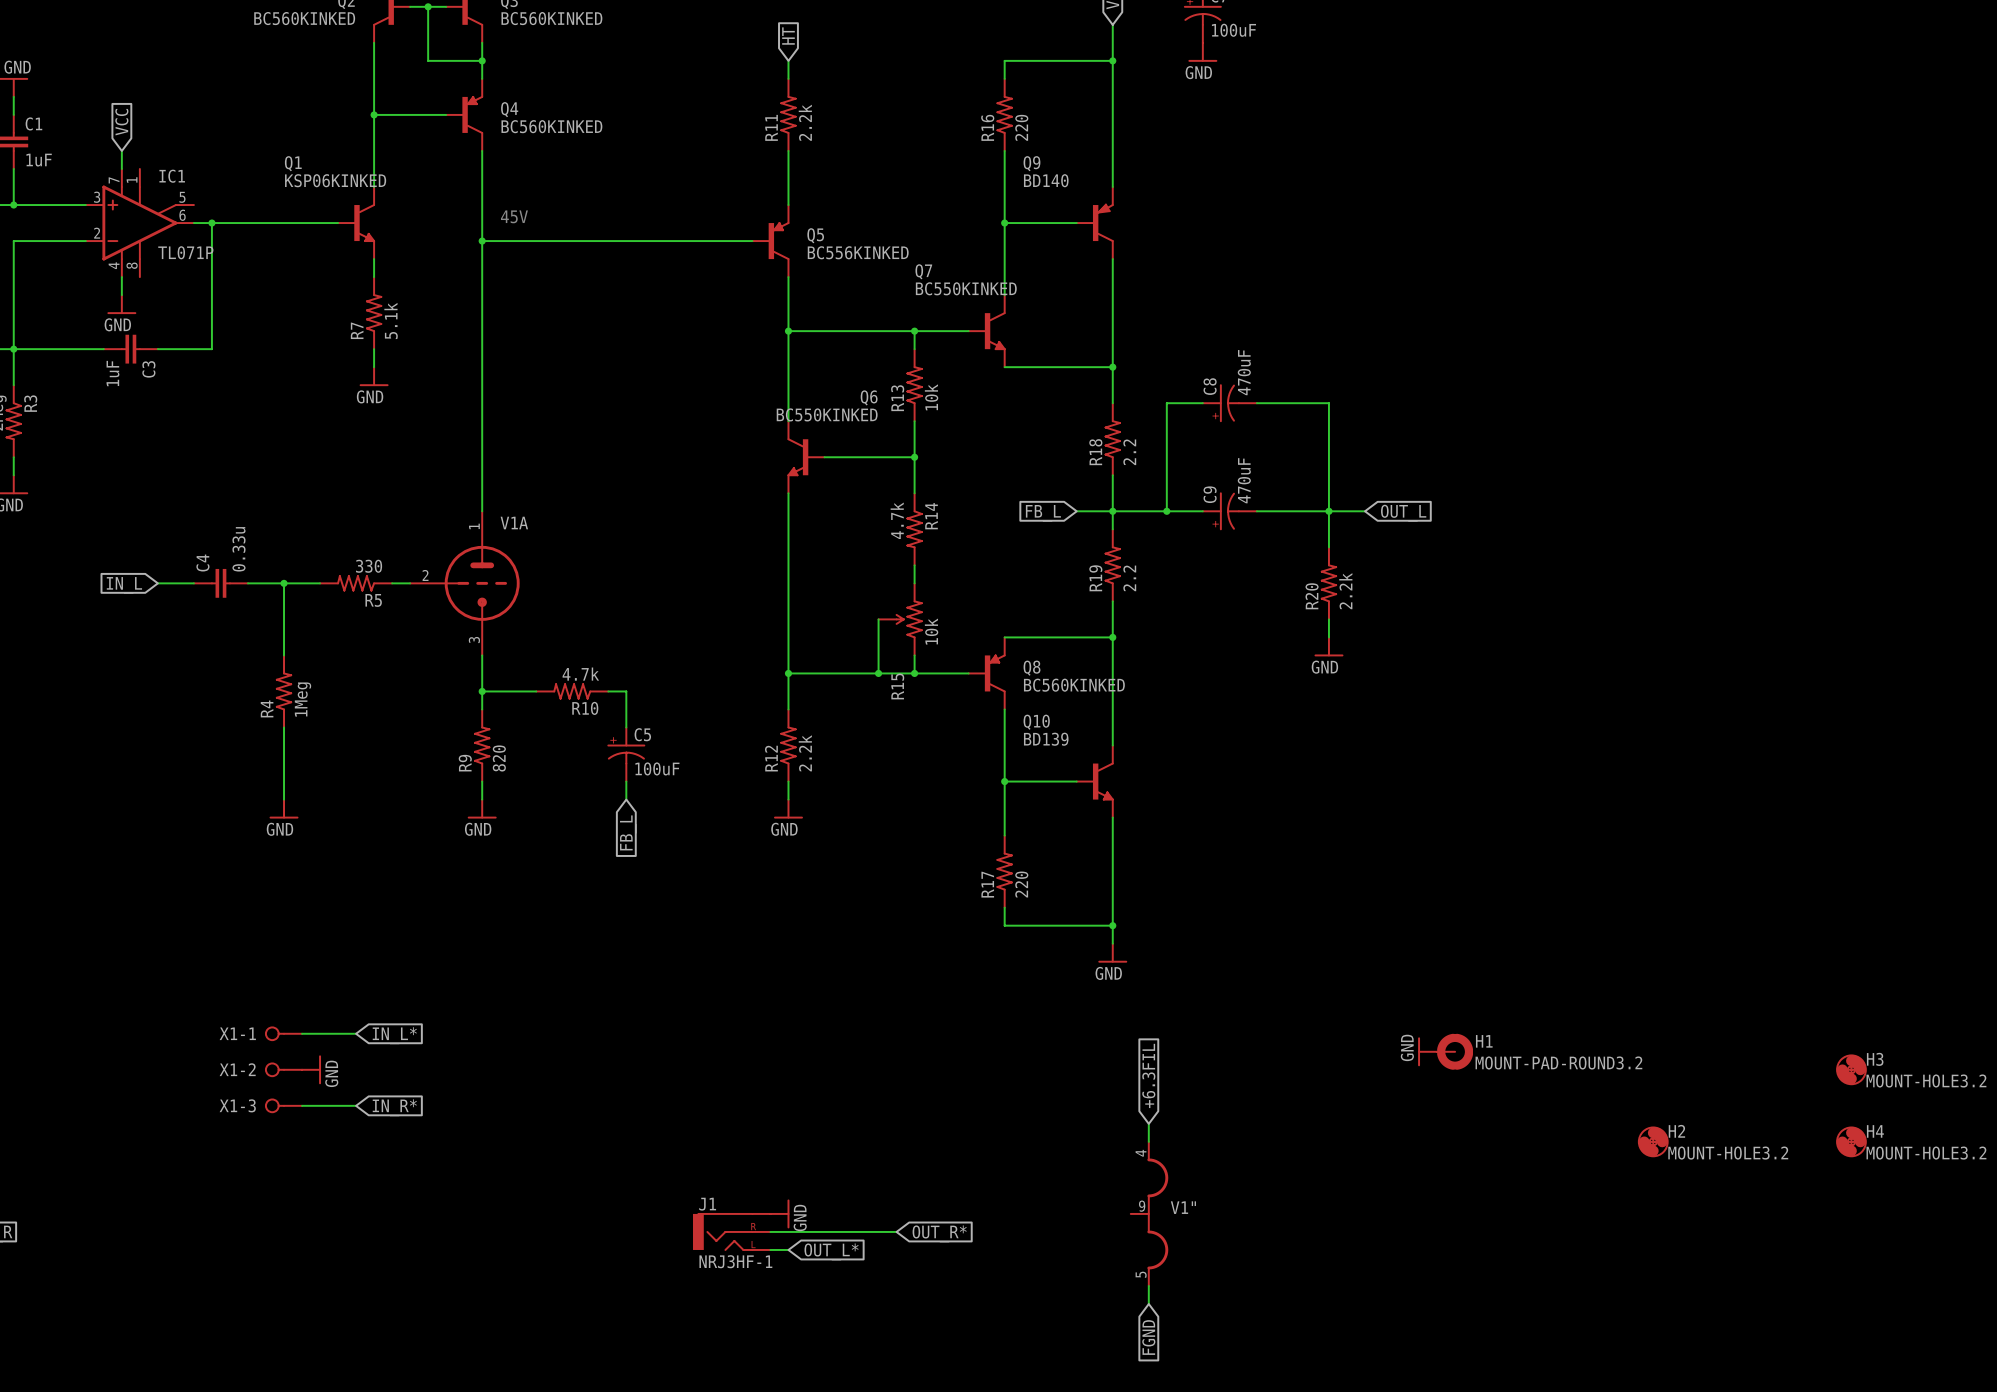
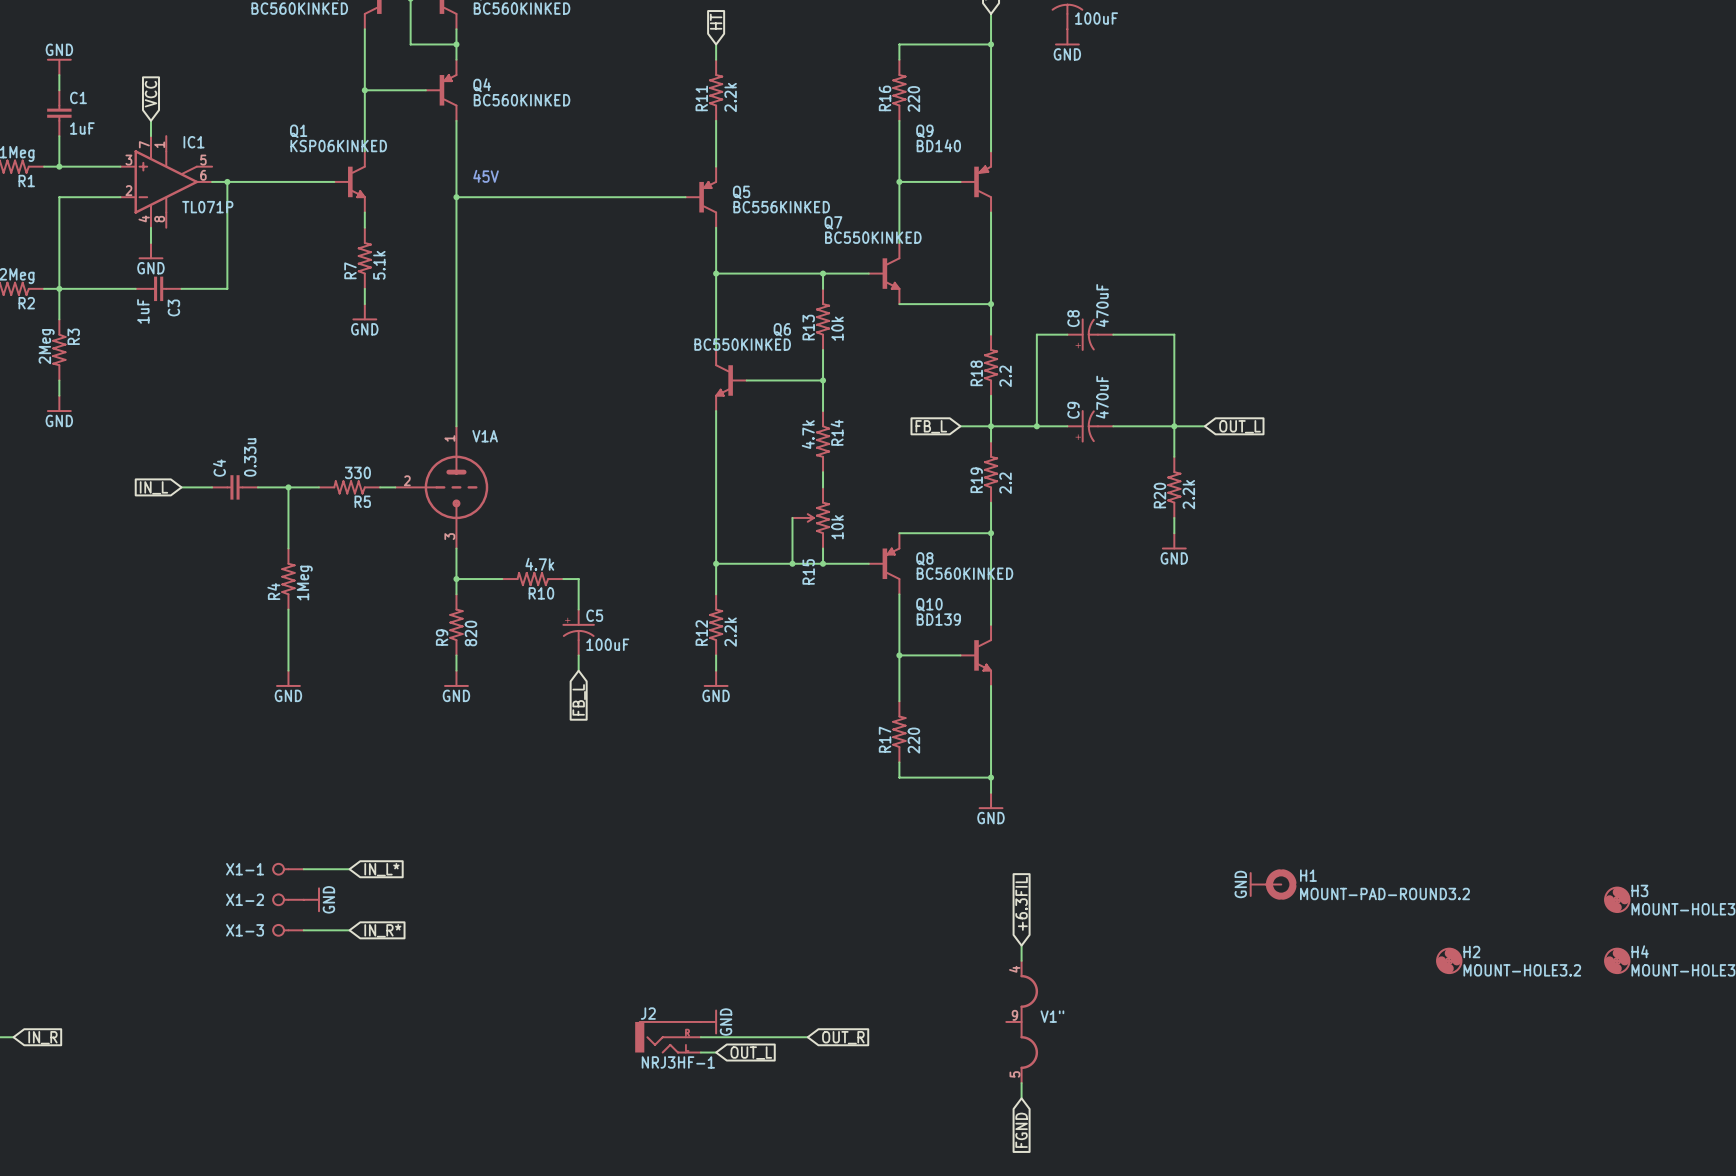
J1 name: J1 (707, 1204) -> J2 (648, 1013)
global label: OUT_R* (939, 1233) -> OUT_R (843, 1037)
global label: OUT_L* (831, 1251) -> OUT_L (751, 1053)

